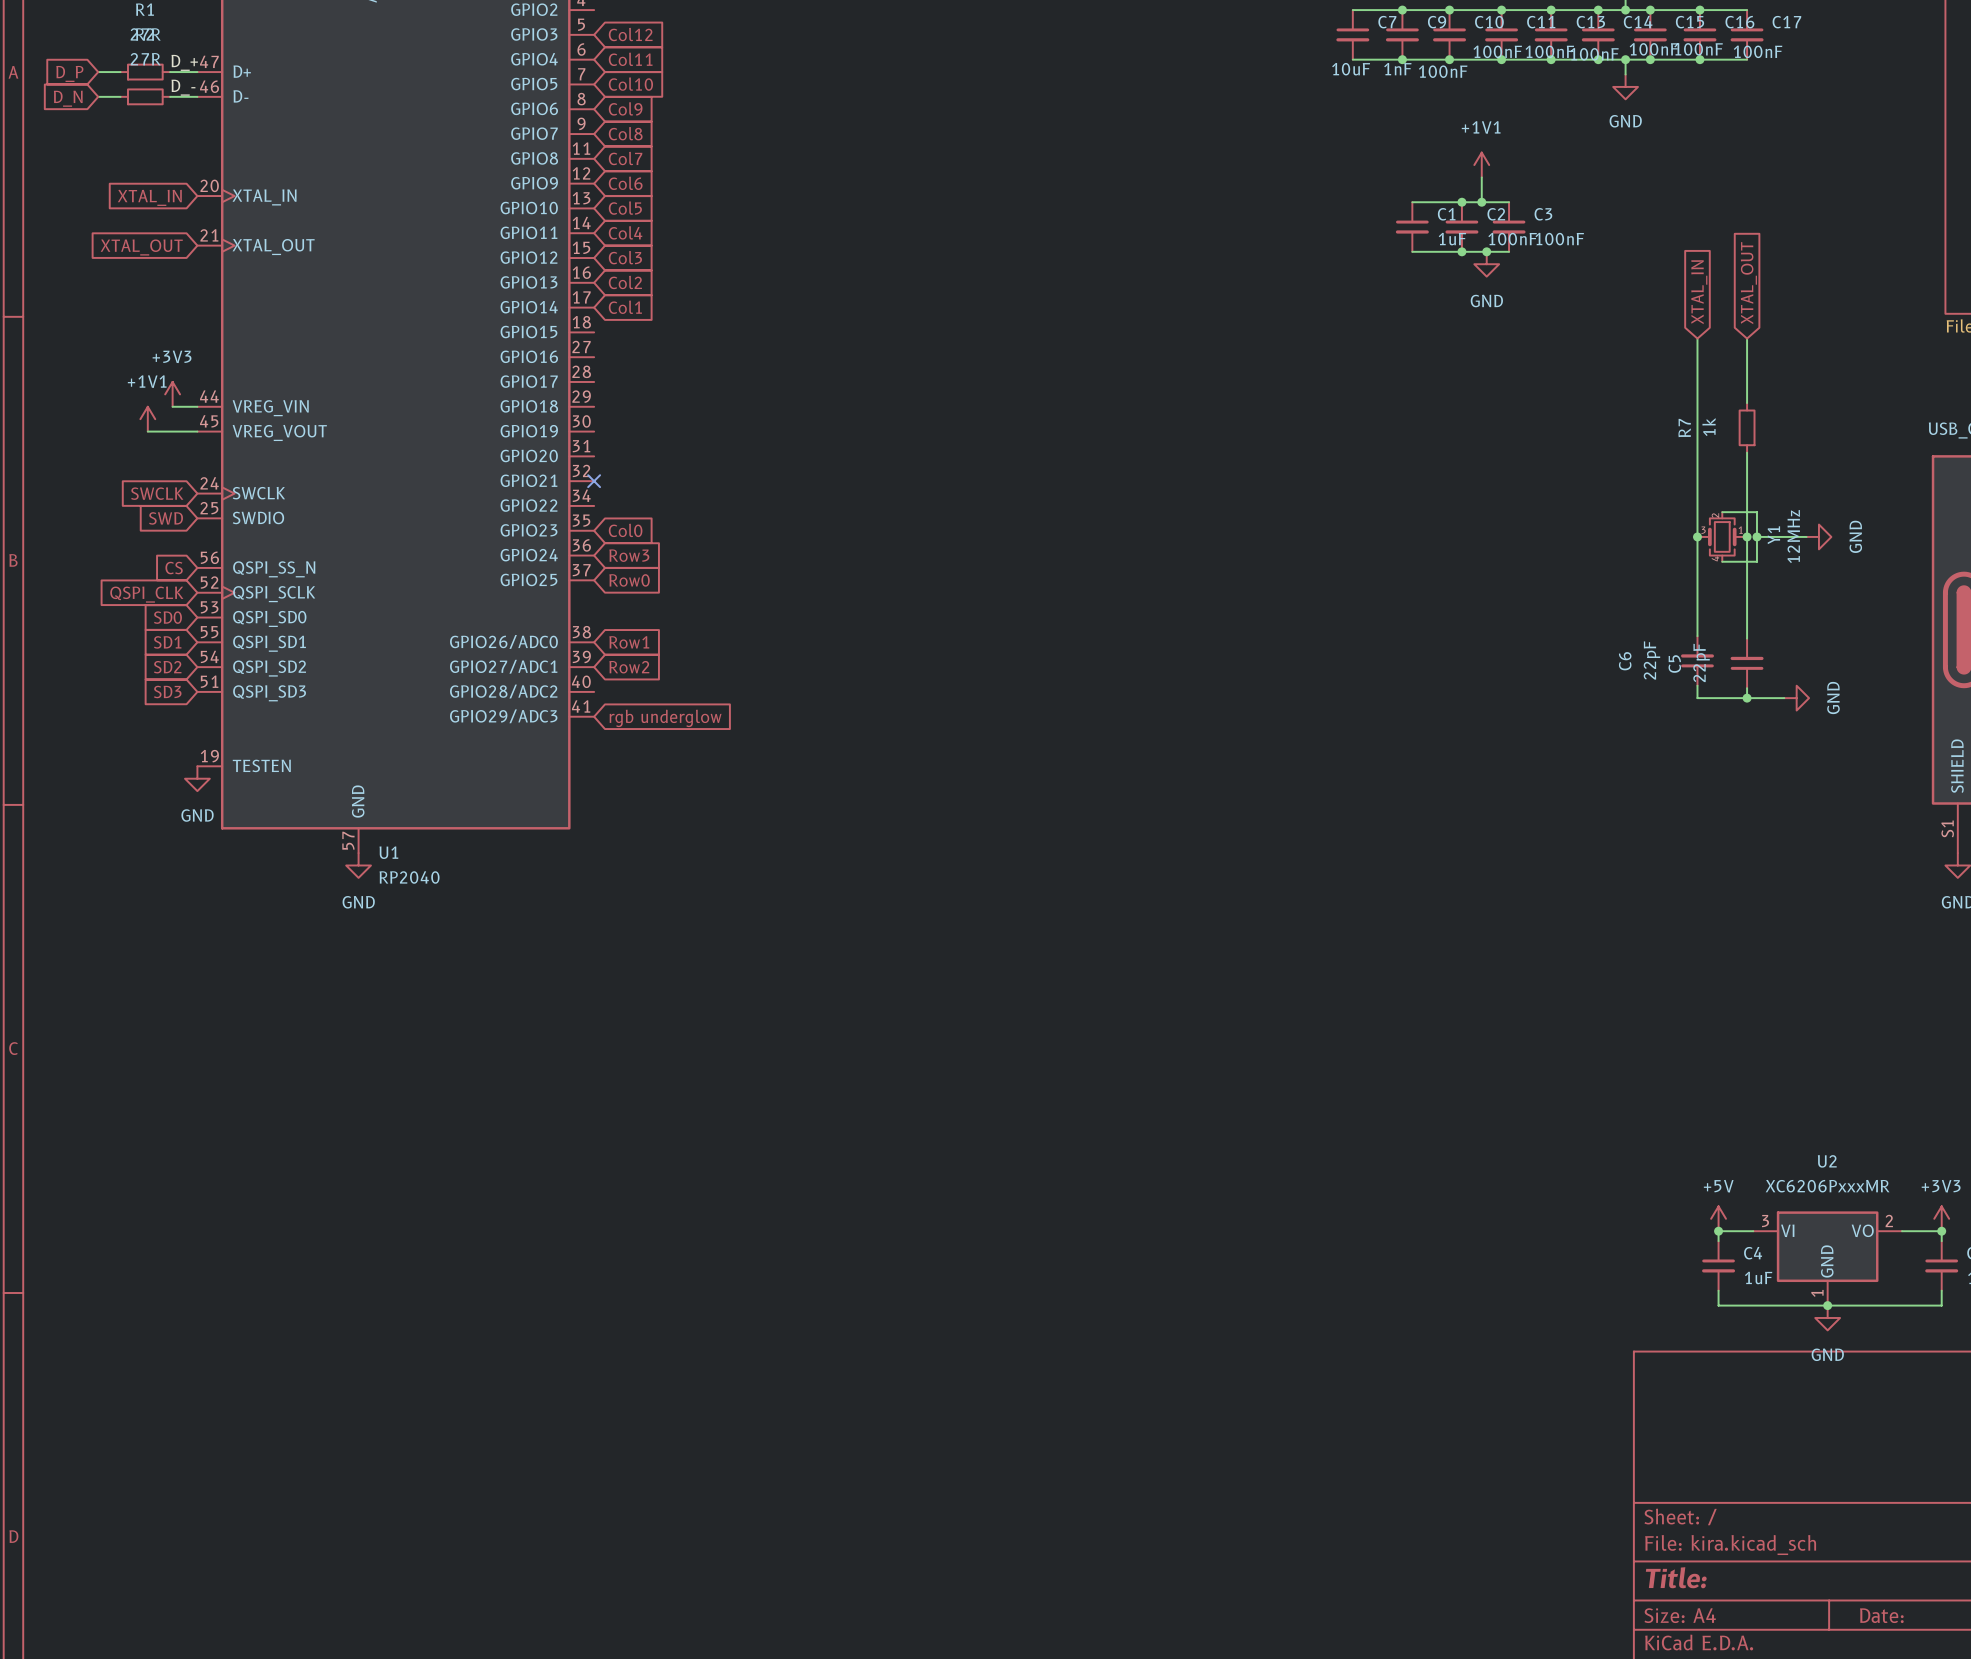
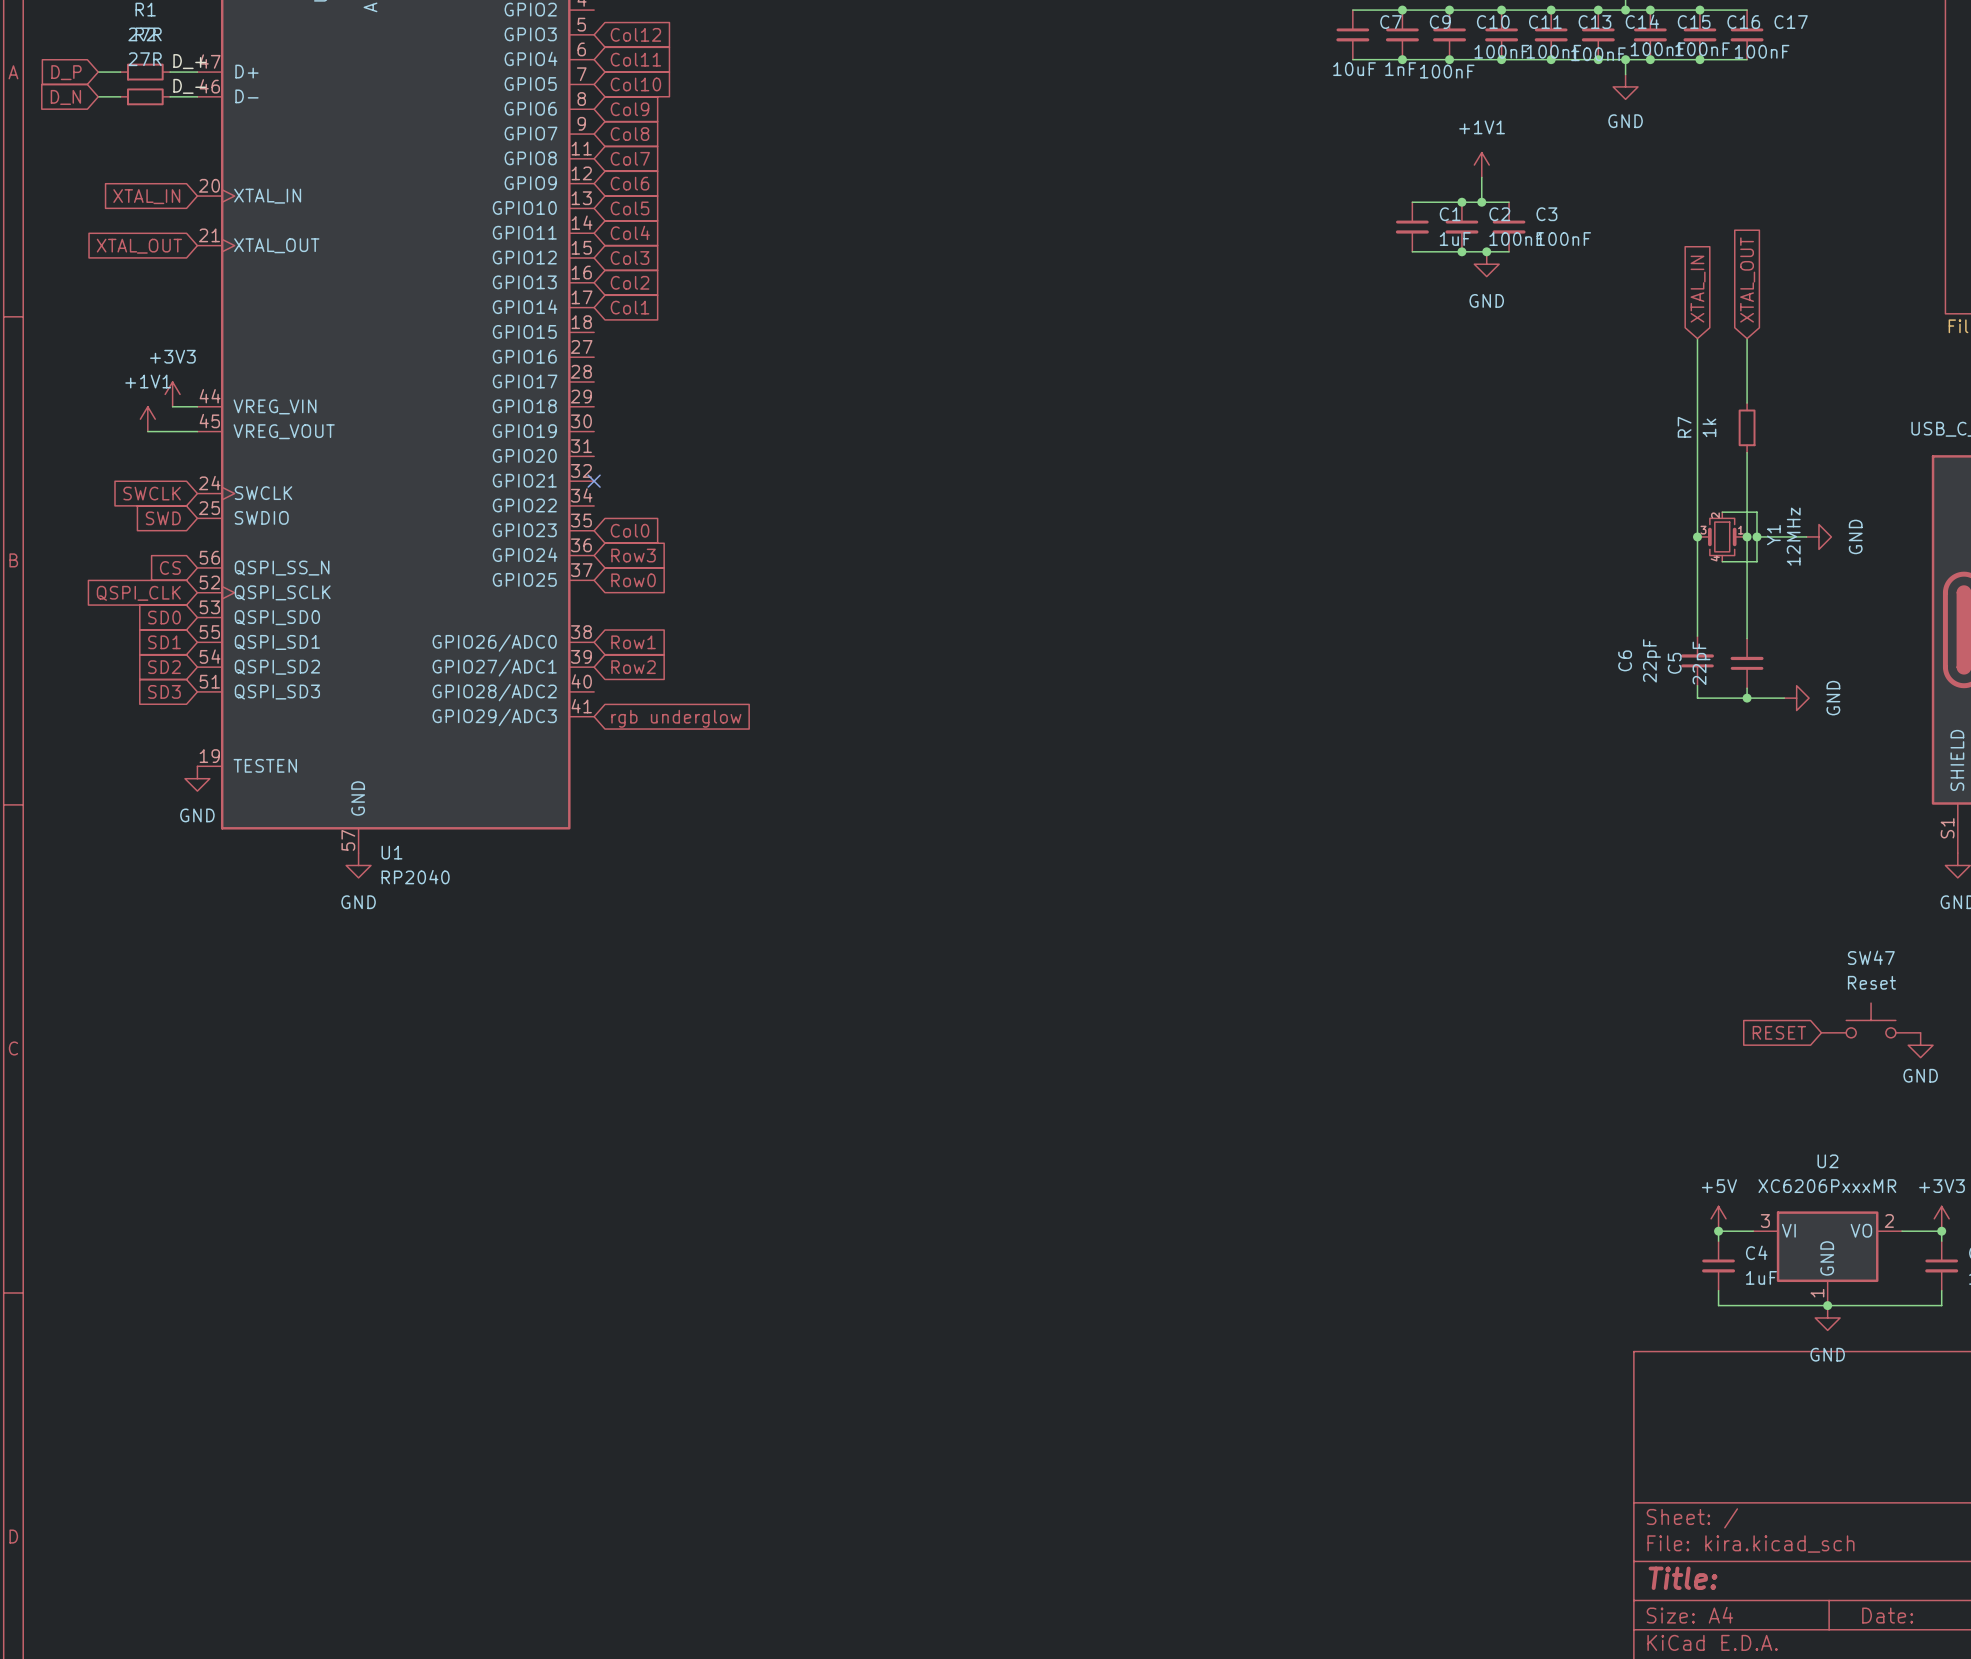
SW47: none -> Reset (1871, 1020)
global label: none -> RESET (1779, 1032)
power symbol: none -> GND (1920, 1045)

